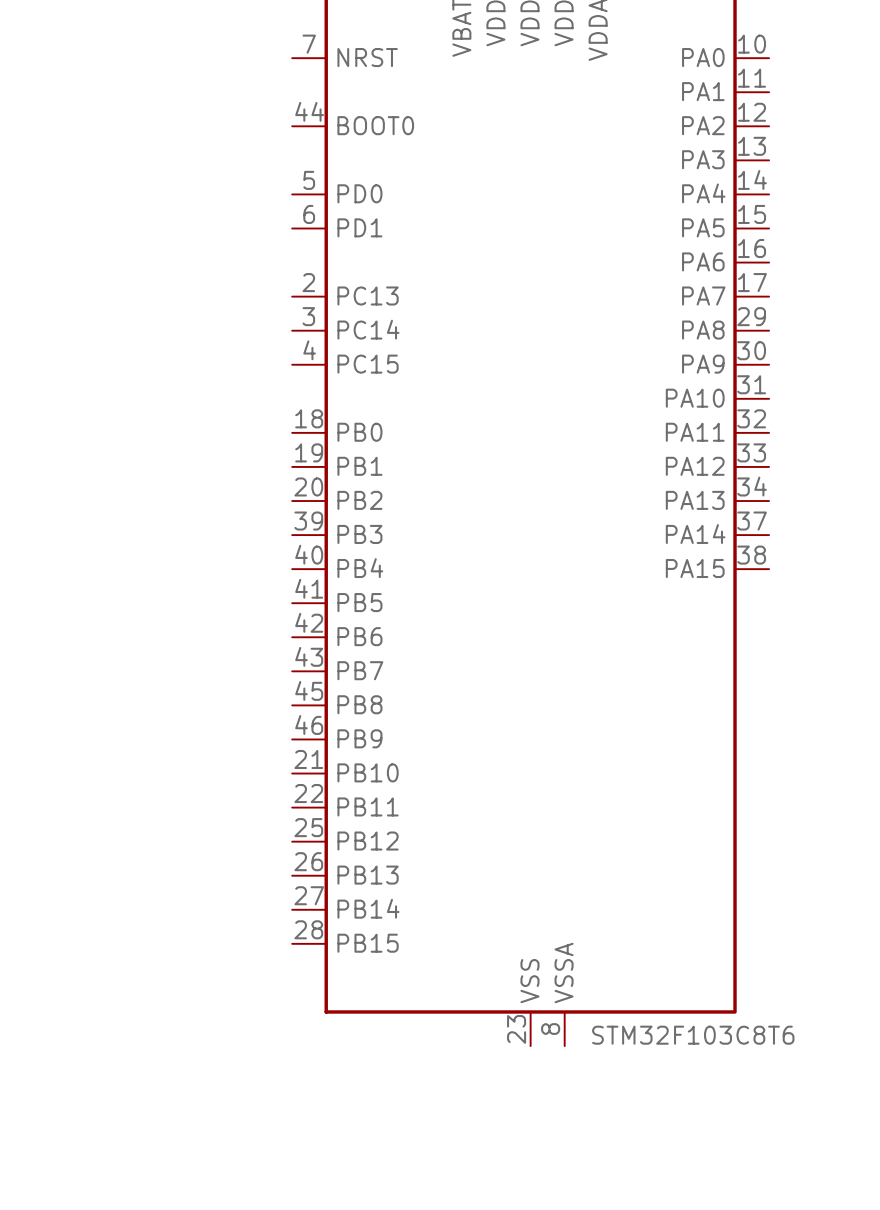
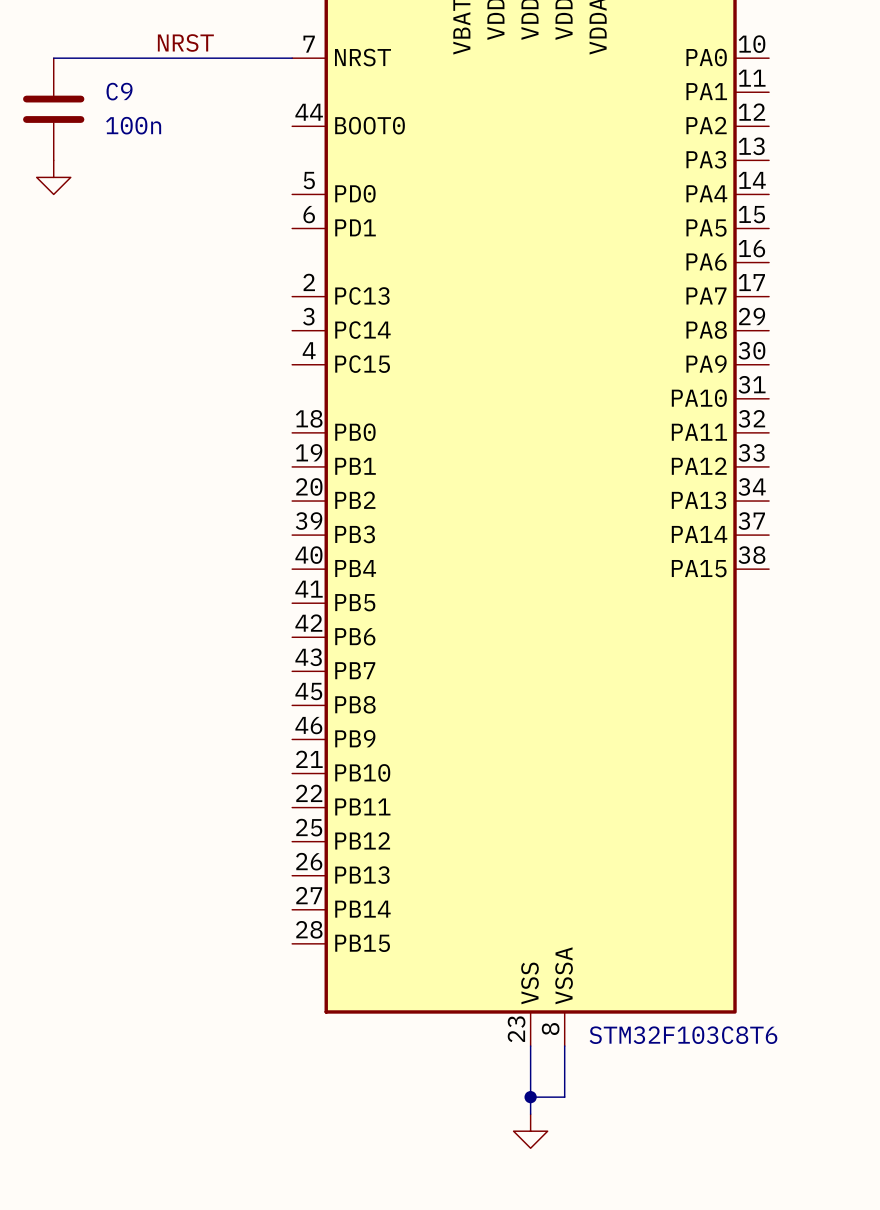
label: none -> NRST (185, 42)
wire: none -> (53, 58) (292, 58)
C9: none -> 100n (53, 109)
power symbol: none -> (53, 177)
wire: none -> (530, 1046) (530, 1114)
wire: none -> (564, 1046) (564, 1097) (530, 1097)
junction: none -> (530, 1097)
power symbol: none -> (530, 1131)

